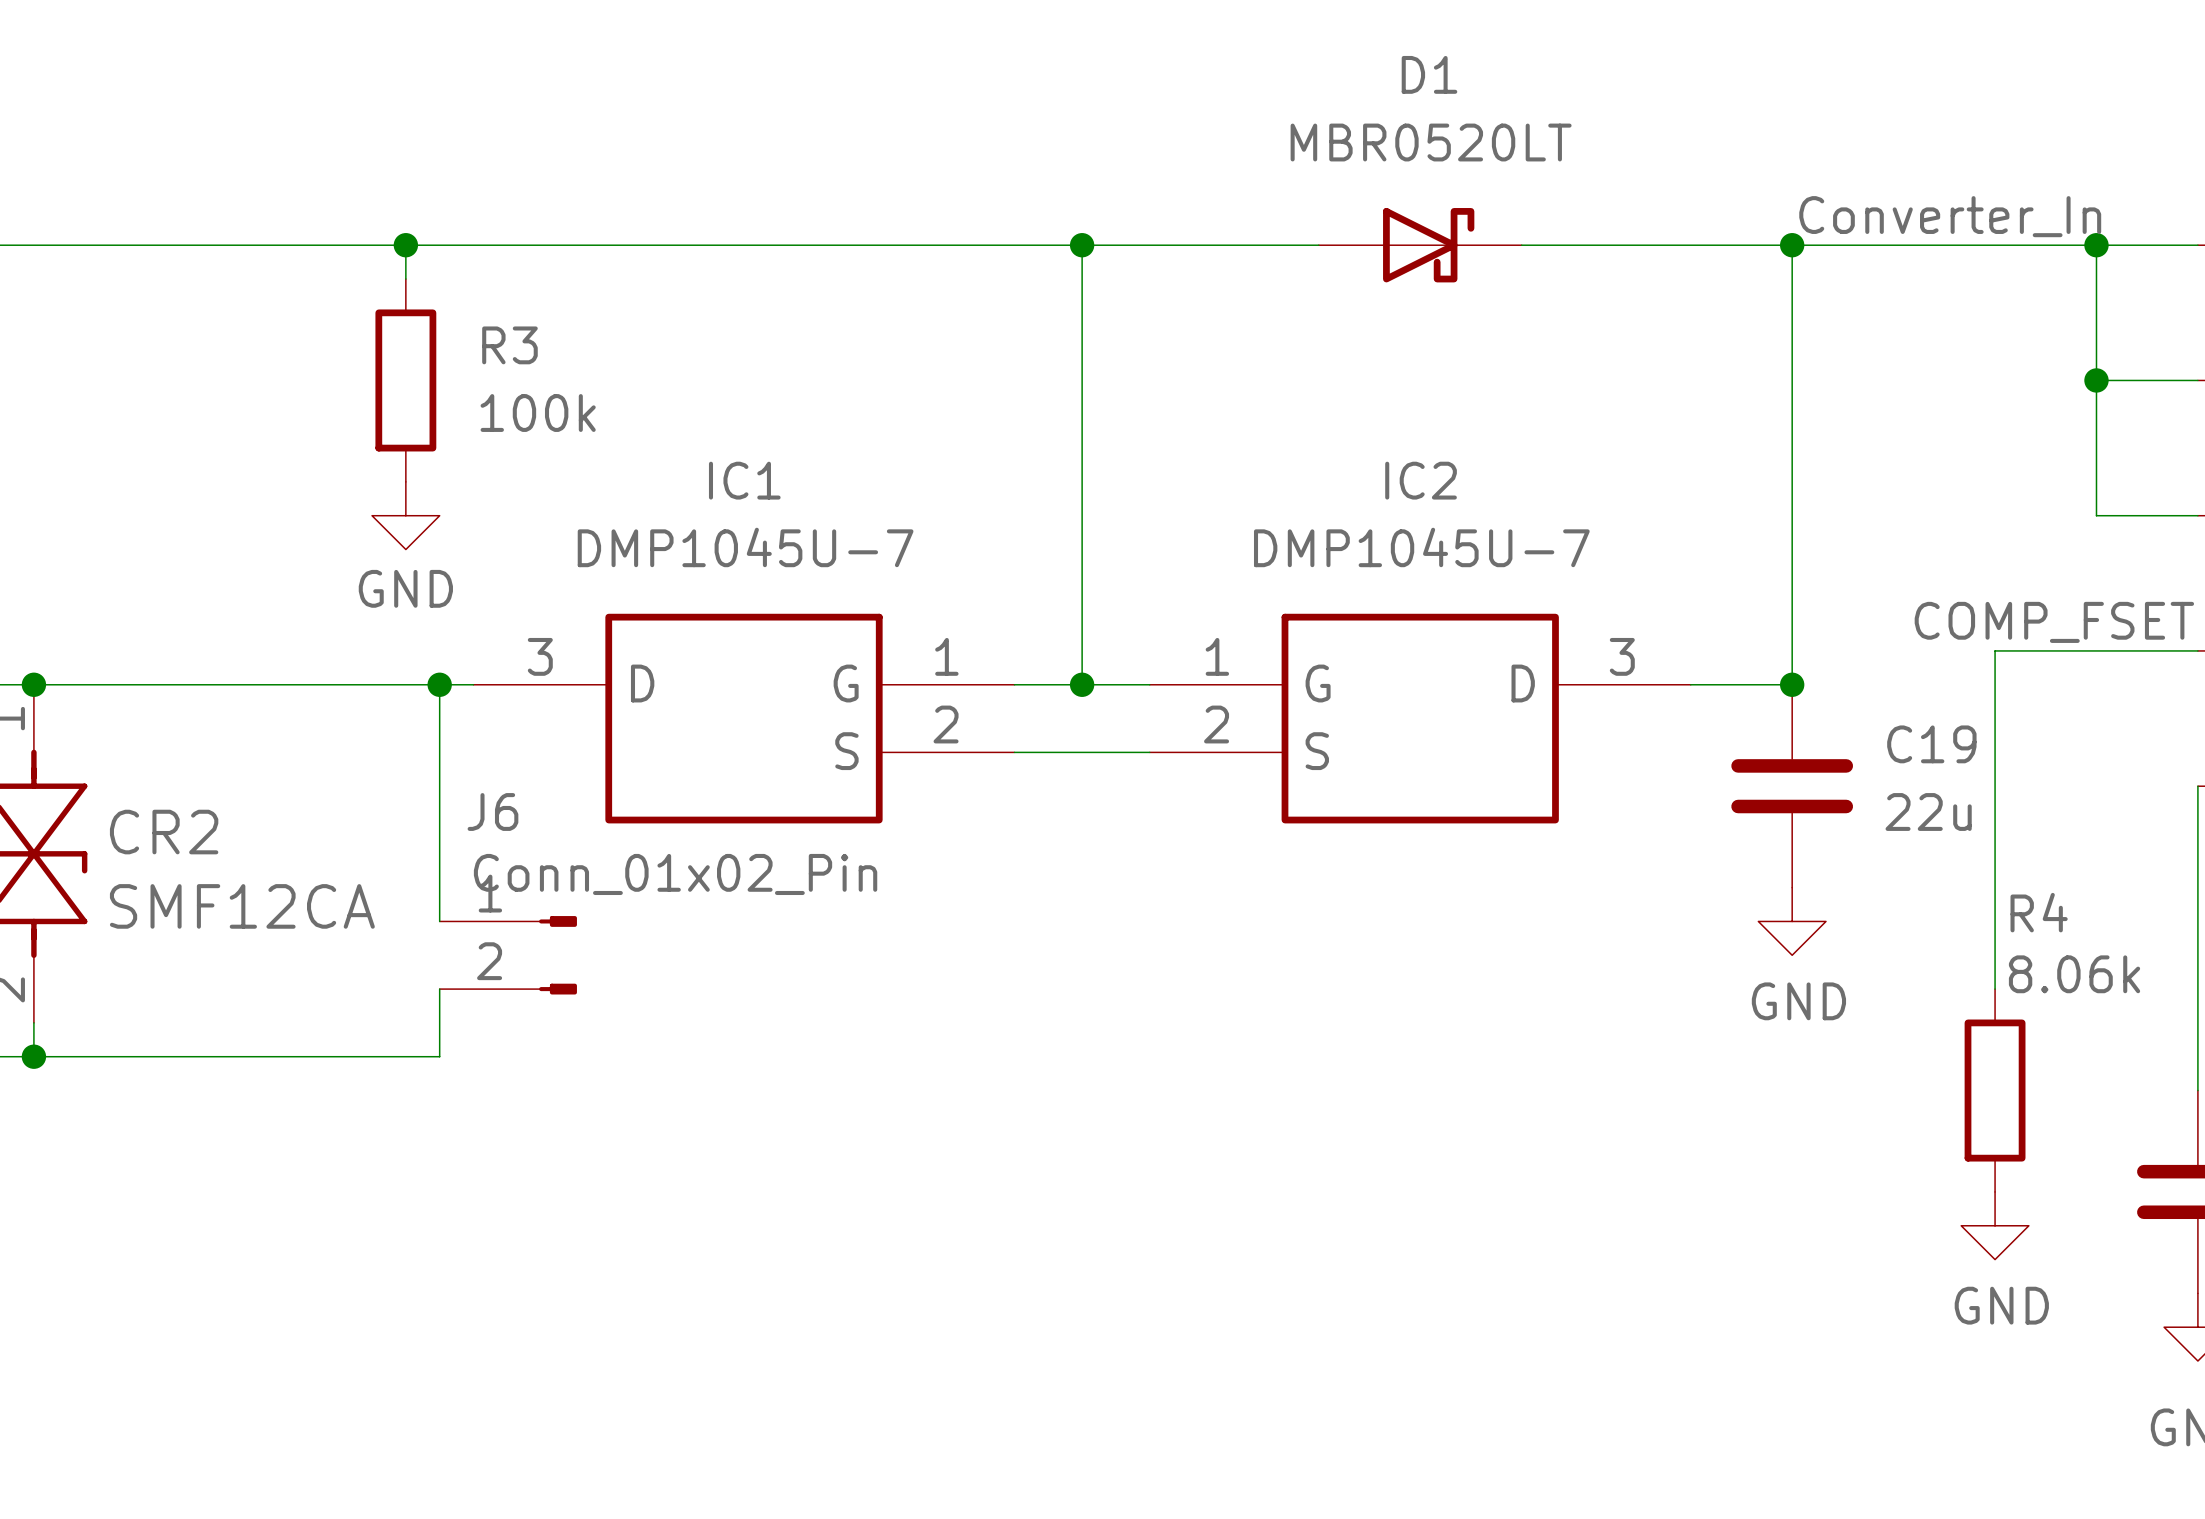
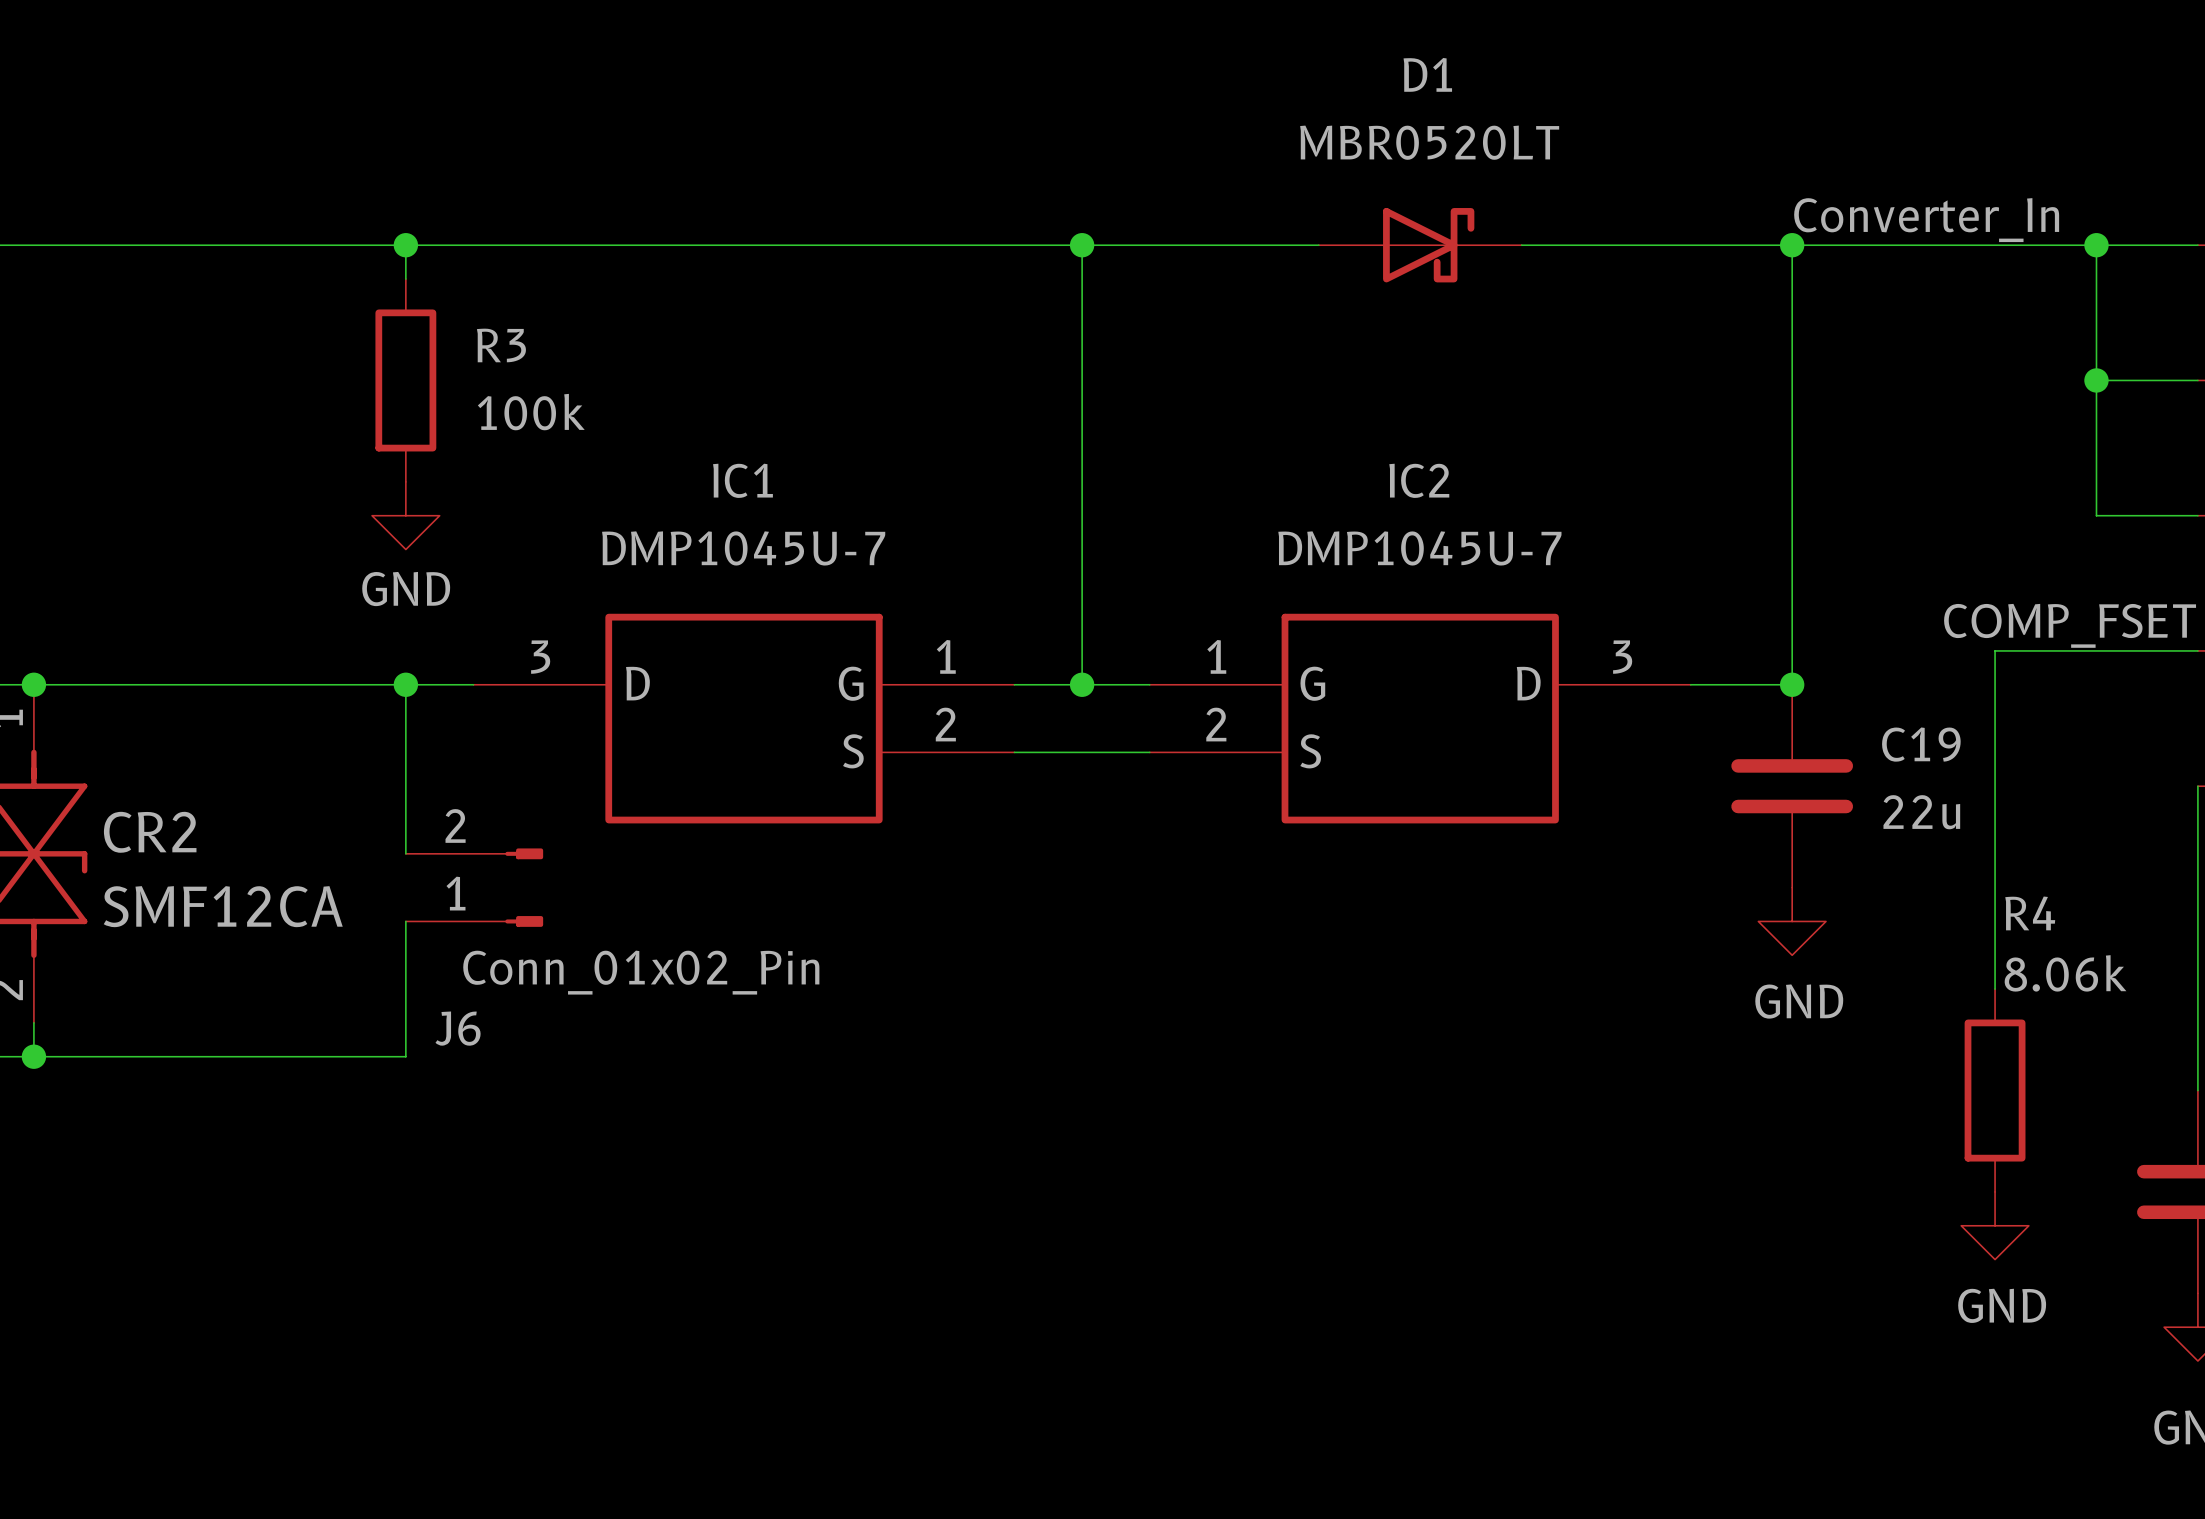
wire: none -> (405, 684) (405, 853)
wire: (439, 684) (439, 921) -> none
junction position: (439, 684) -> (405, 684)
J6 flip: as is (558, 955) -> up-down (524, 887)
wire: (439, 989) (439, 1056) (405, 1056) -> (405, 921) (405, 1056)

